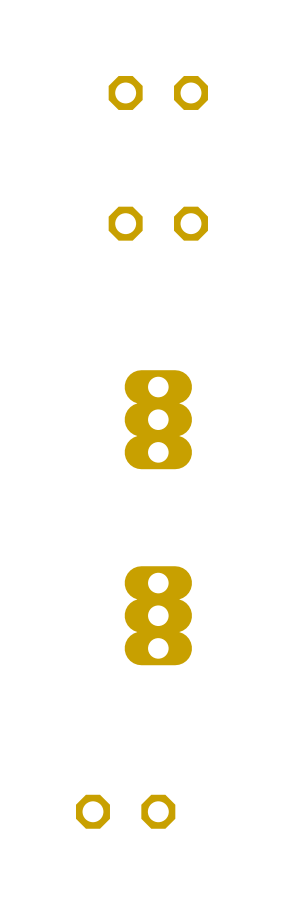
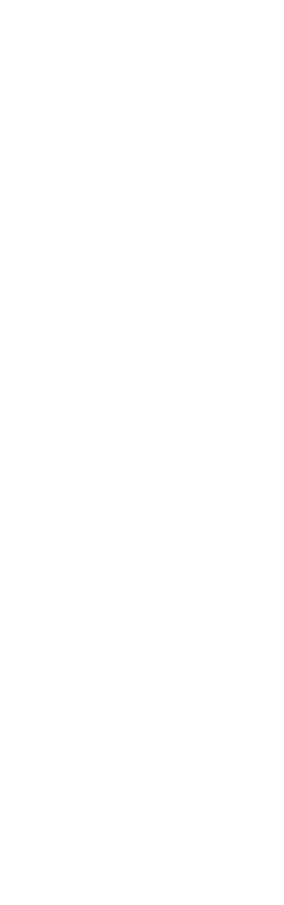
part: (158, 92) -> none
part: (158, 223) -> none
part: (158, 419) -> none
part: (158, 615) -> none
part: (125, 811) -> none

